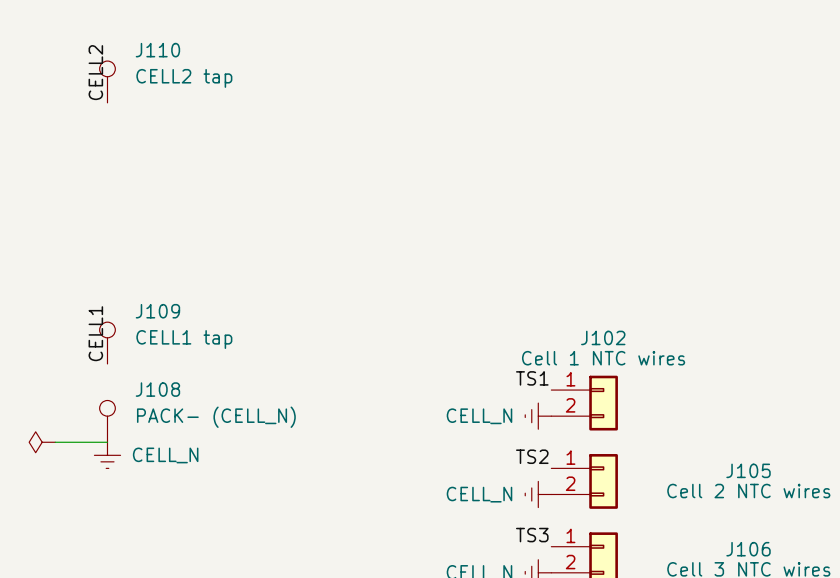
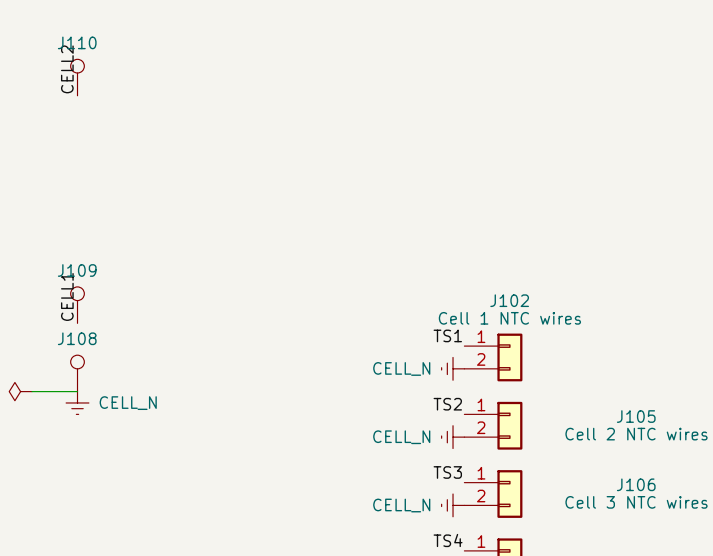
J110 name position: J110 (157, 50) -> J110 (77, 42)
J110 value: CELL2 tap (184, 78) -> none
J109 name position: J109 (157, 311) -> J109 (77, 270)
J109 value: CELL1 tap (184, 339) -> none
J108 name position: J108 (157, 389) -> J108 (77, 338)
J108 value: PACK- (CELL_N) (216, 417) -> none

